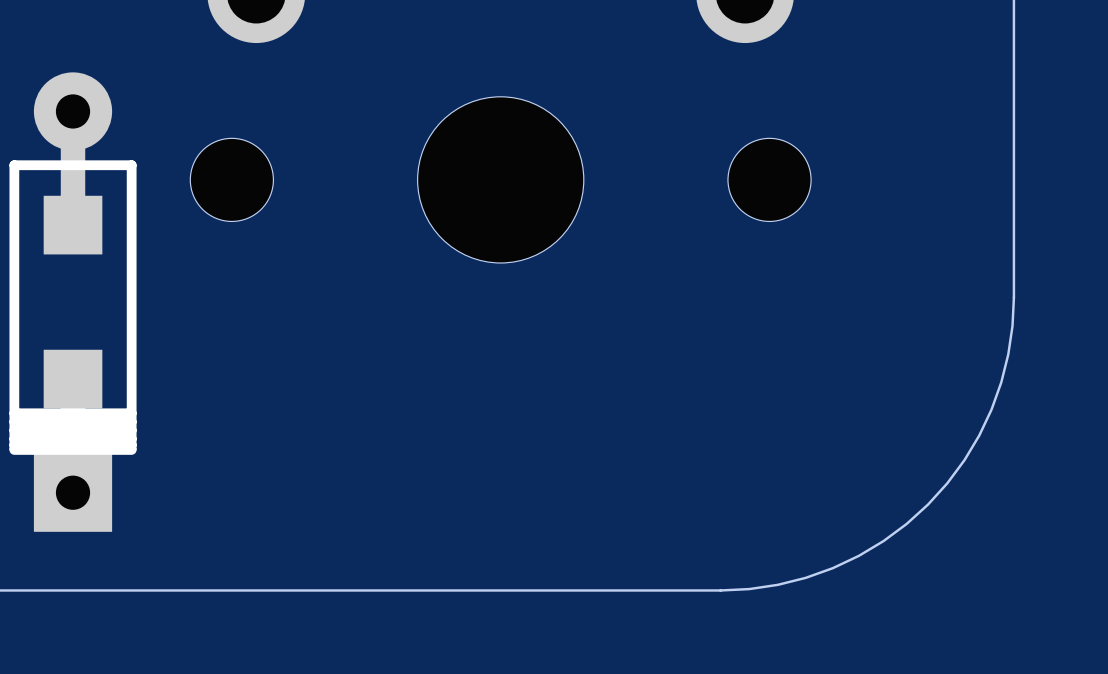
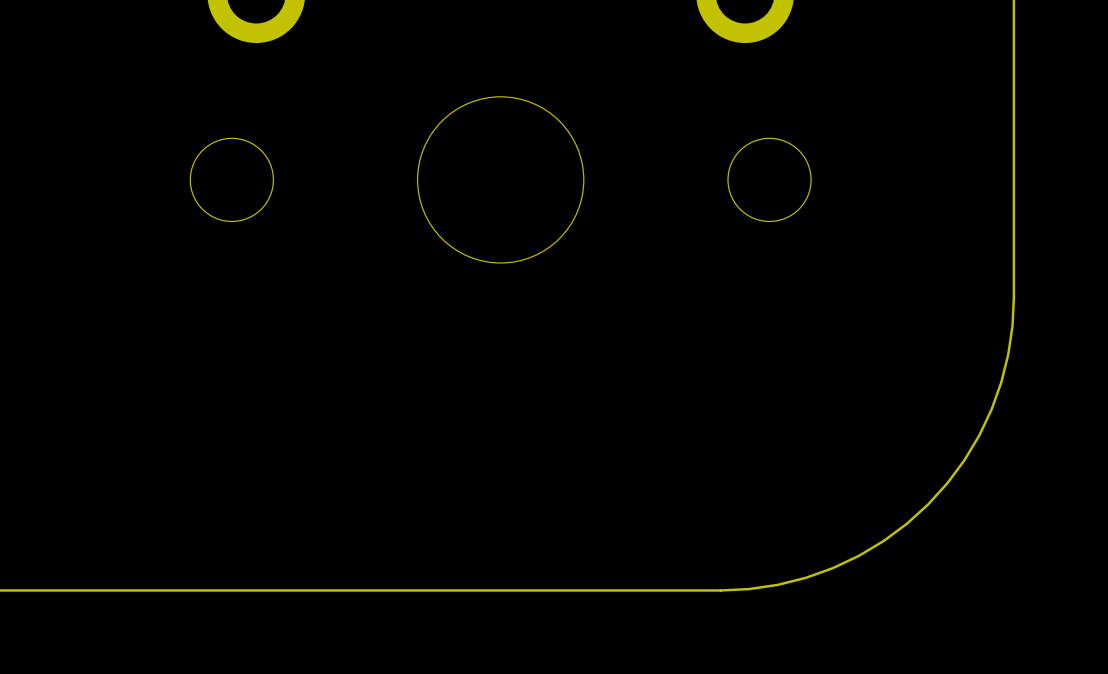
part: (73, 302) -> none

